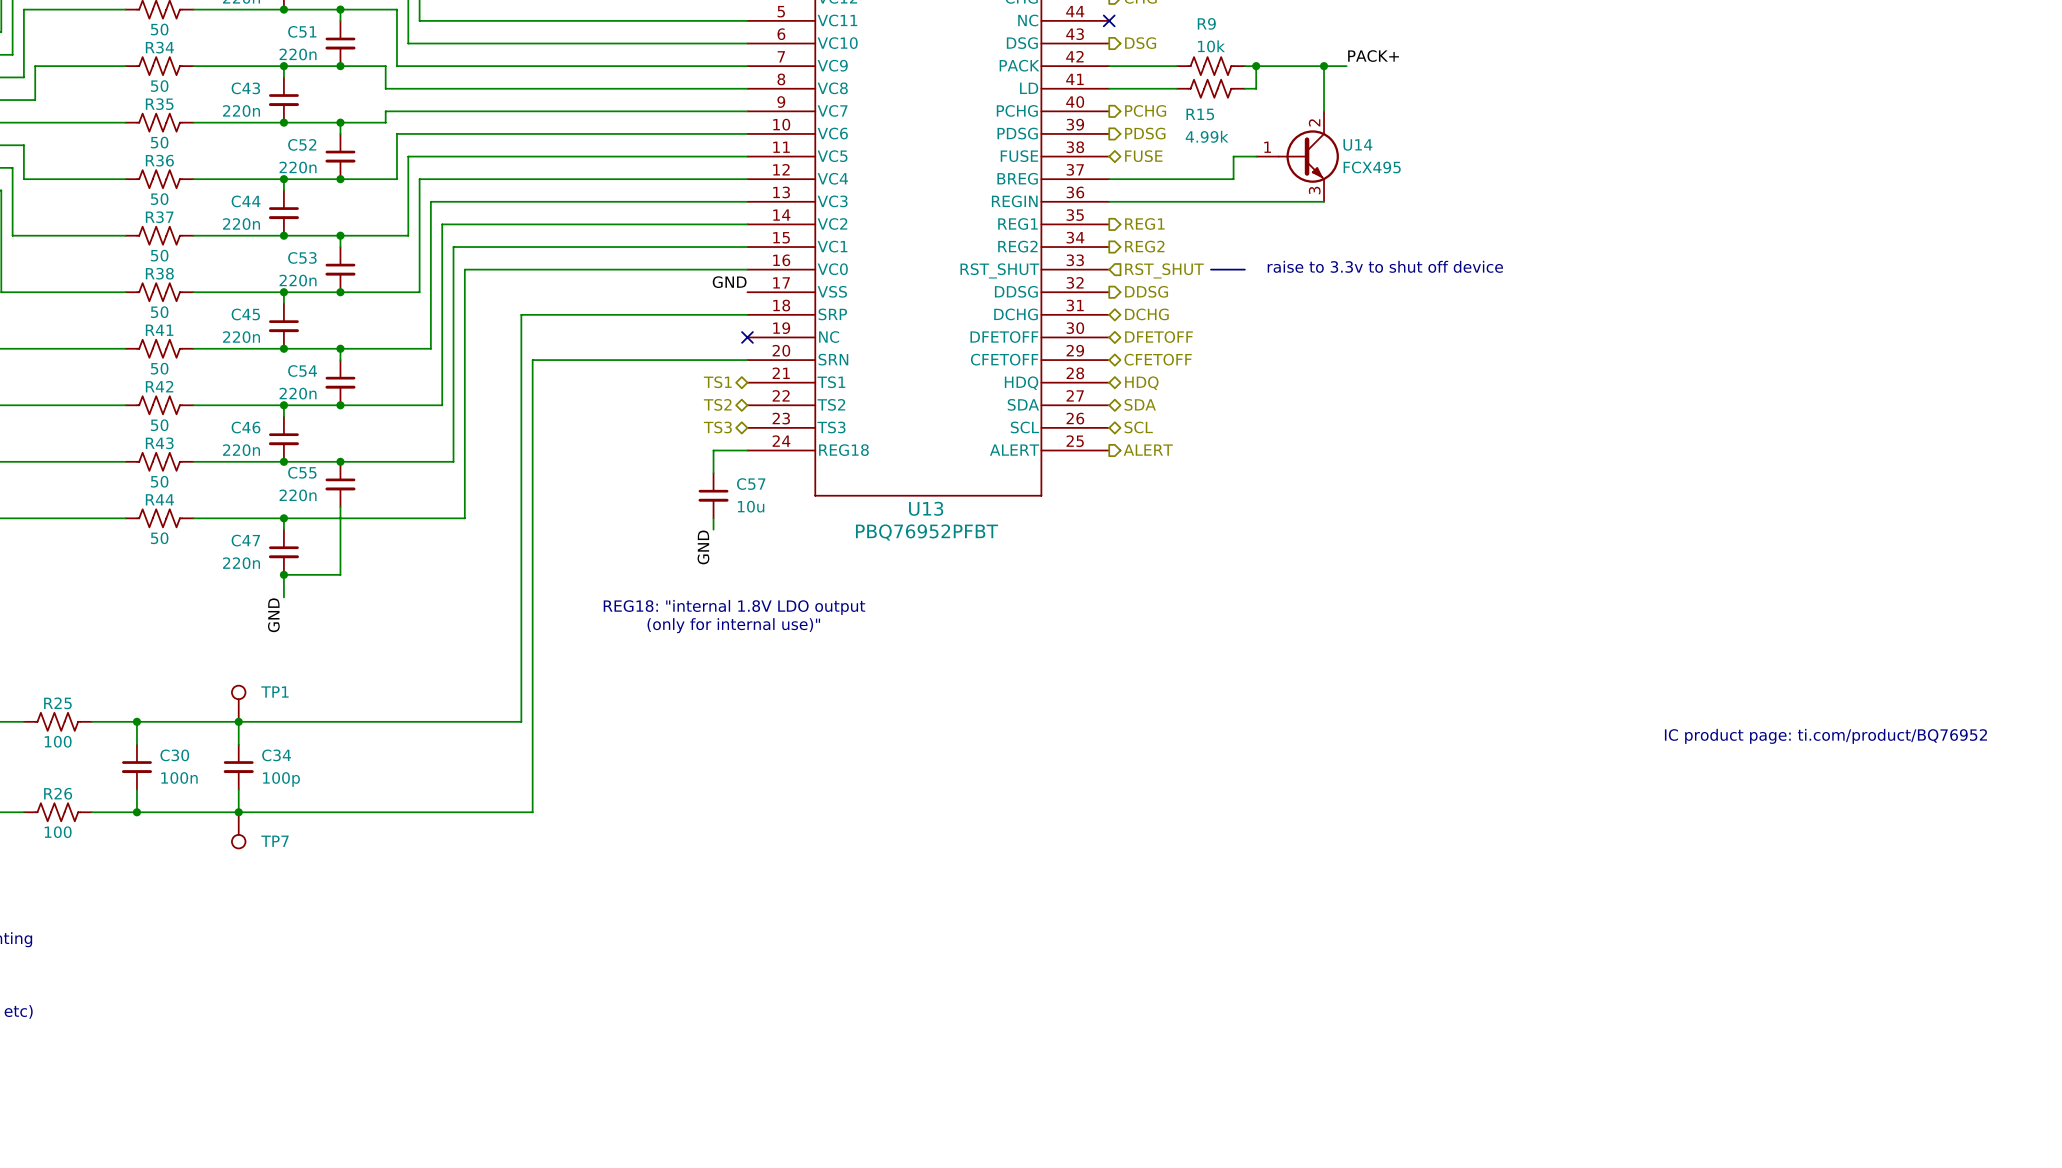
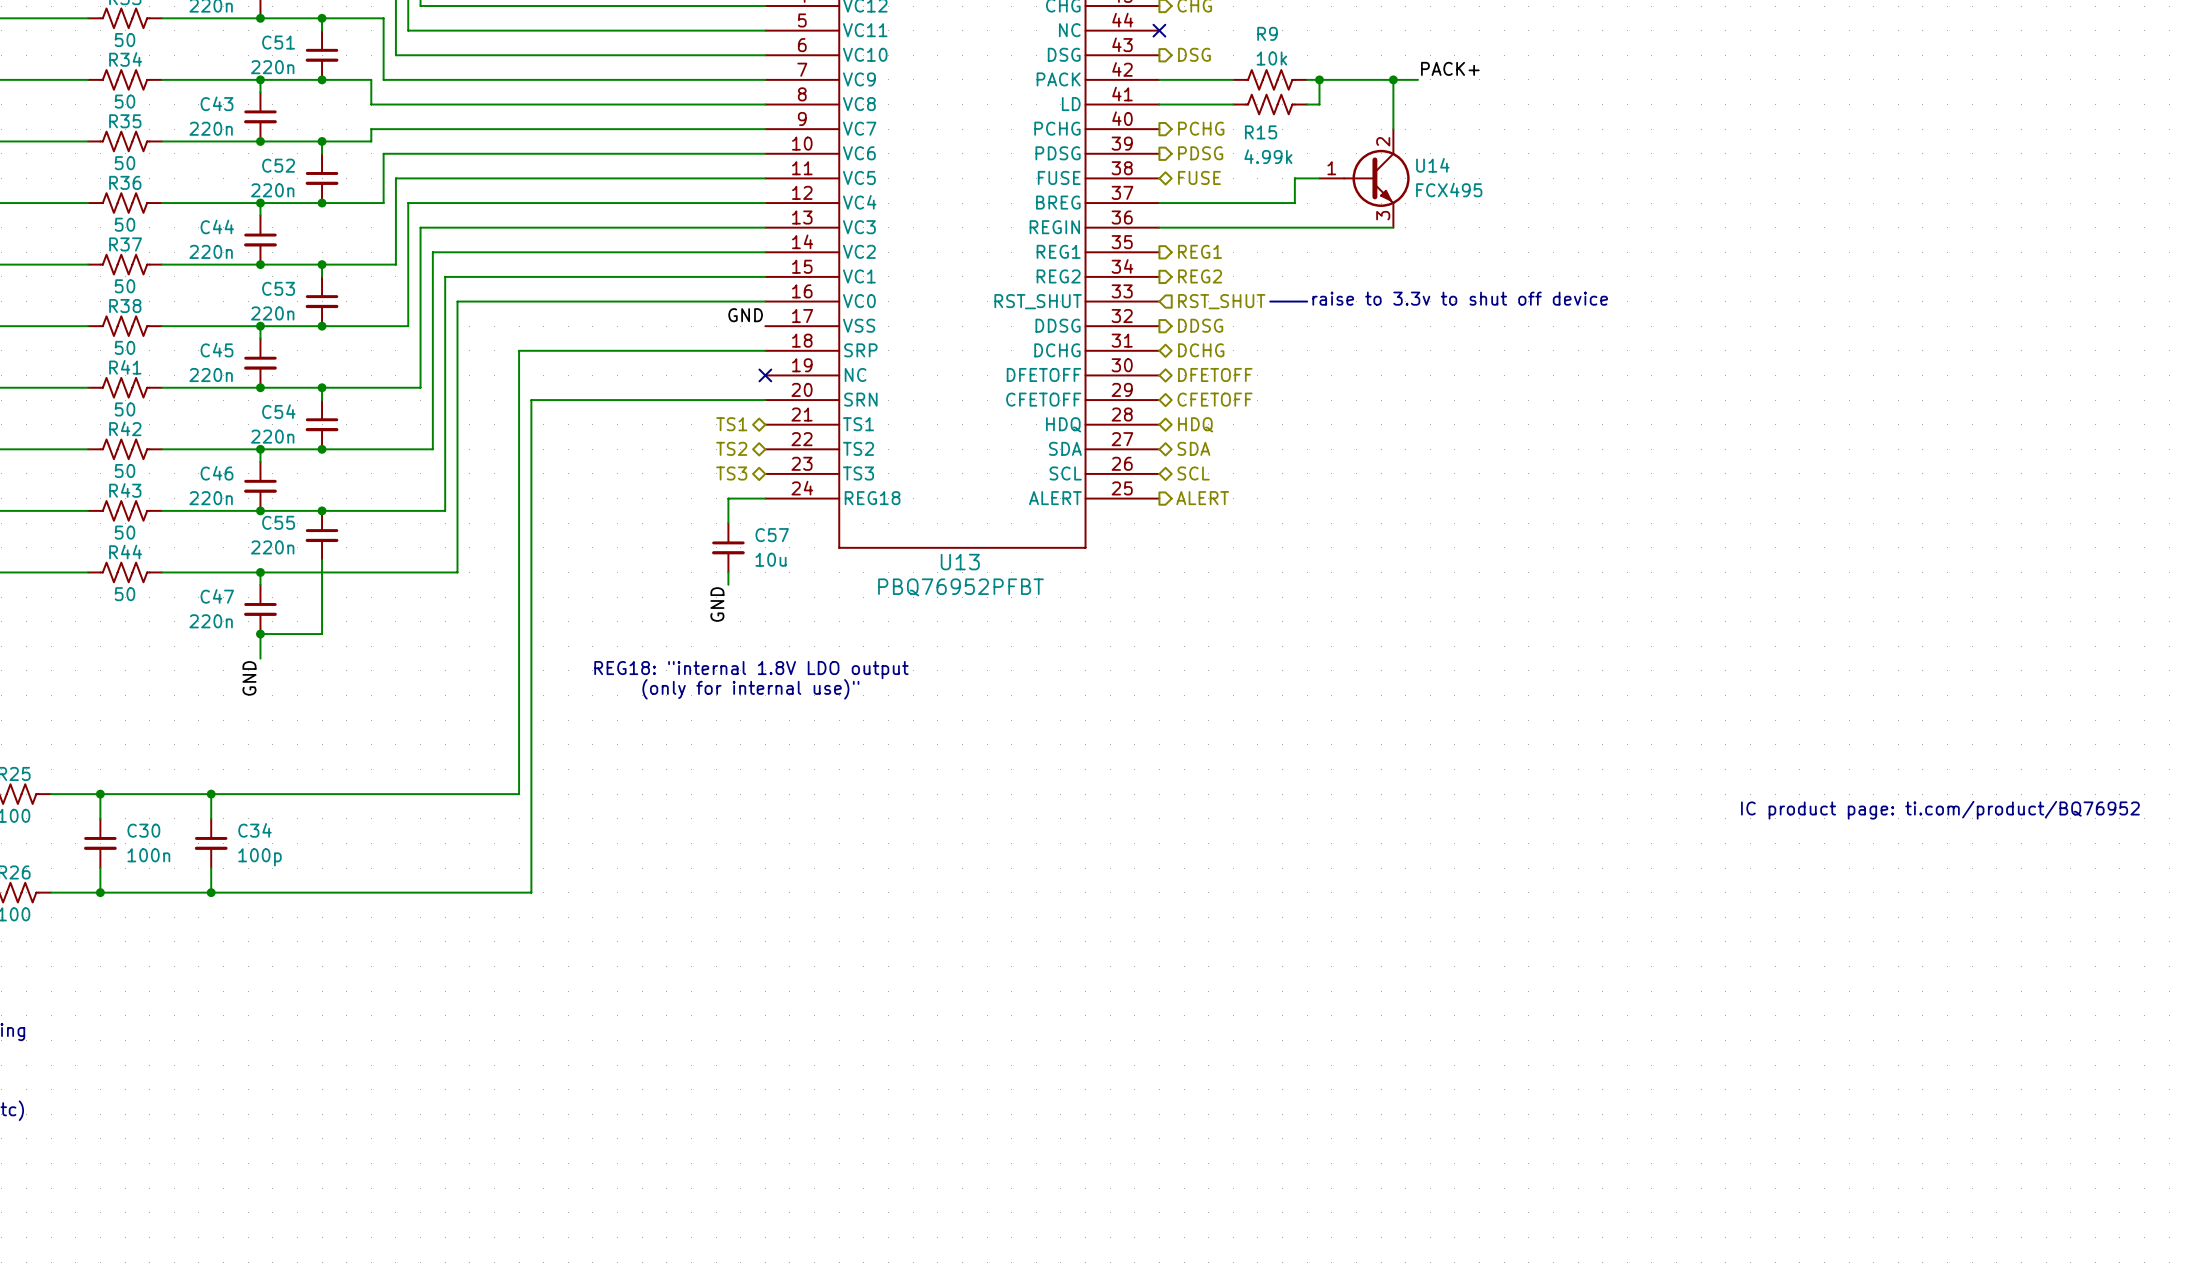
TP1: (238, 703) -> none
TP7: (238, 830) -> none

